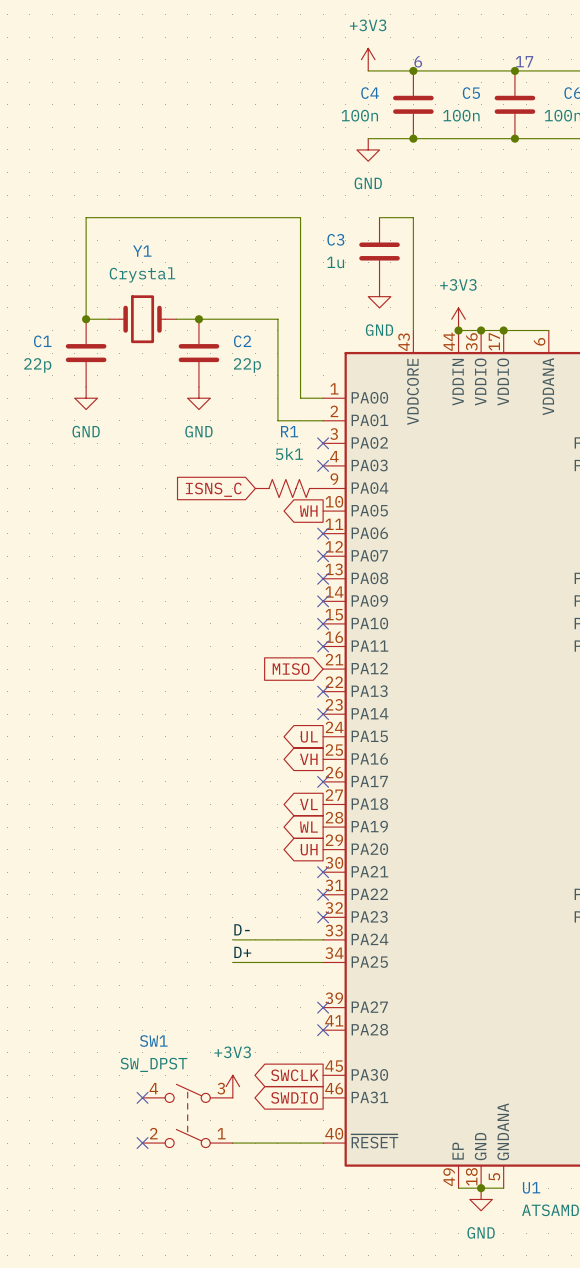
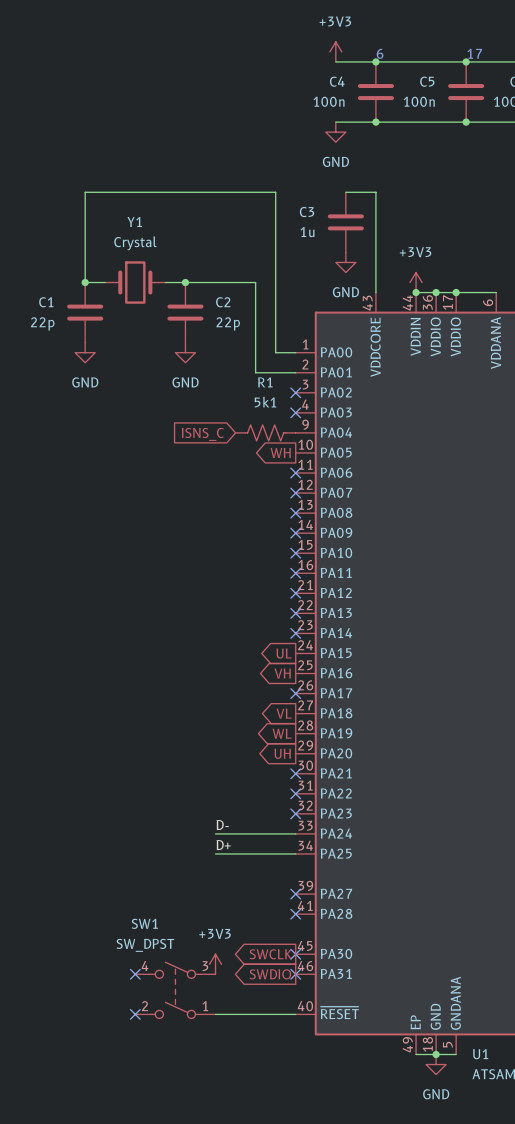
global label: MISO (291, 669) -> none
no-connect mark: none -> (295, 593)
no-connect mark: none -> (295, 954)
no-connect mark: none -> (295, 974)

